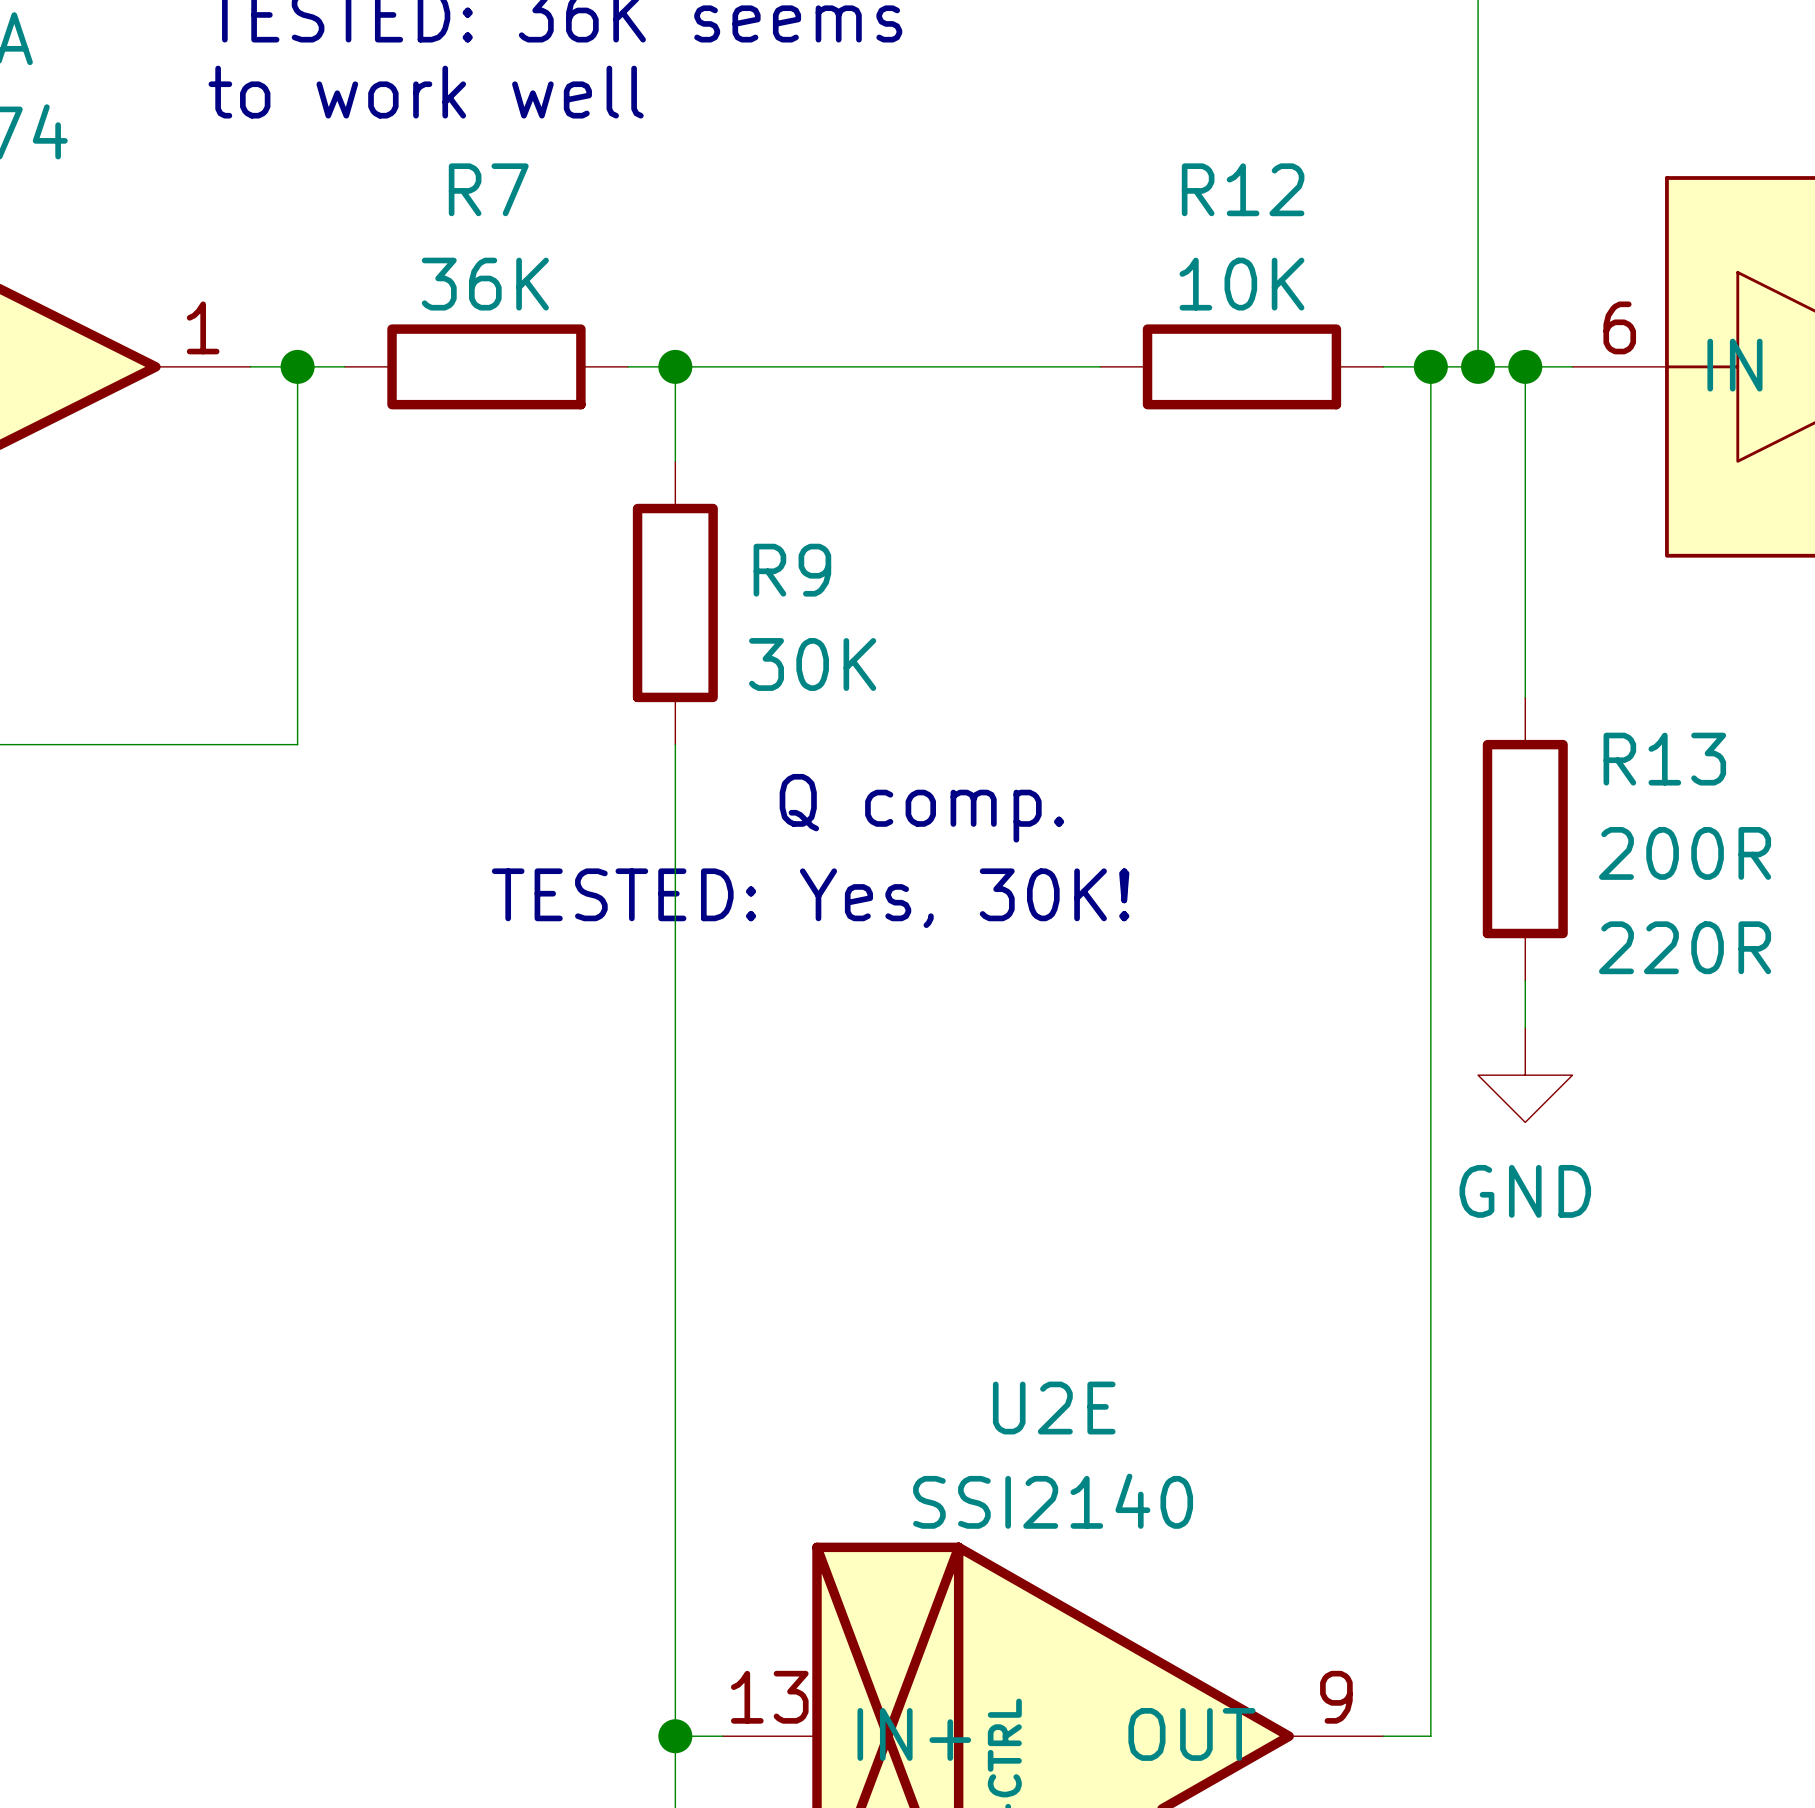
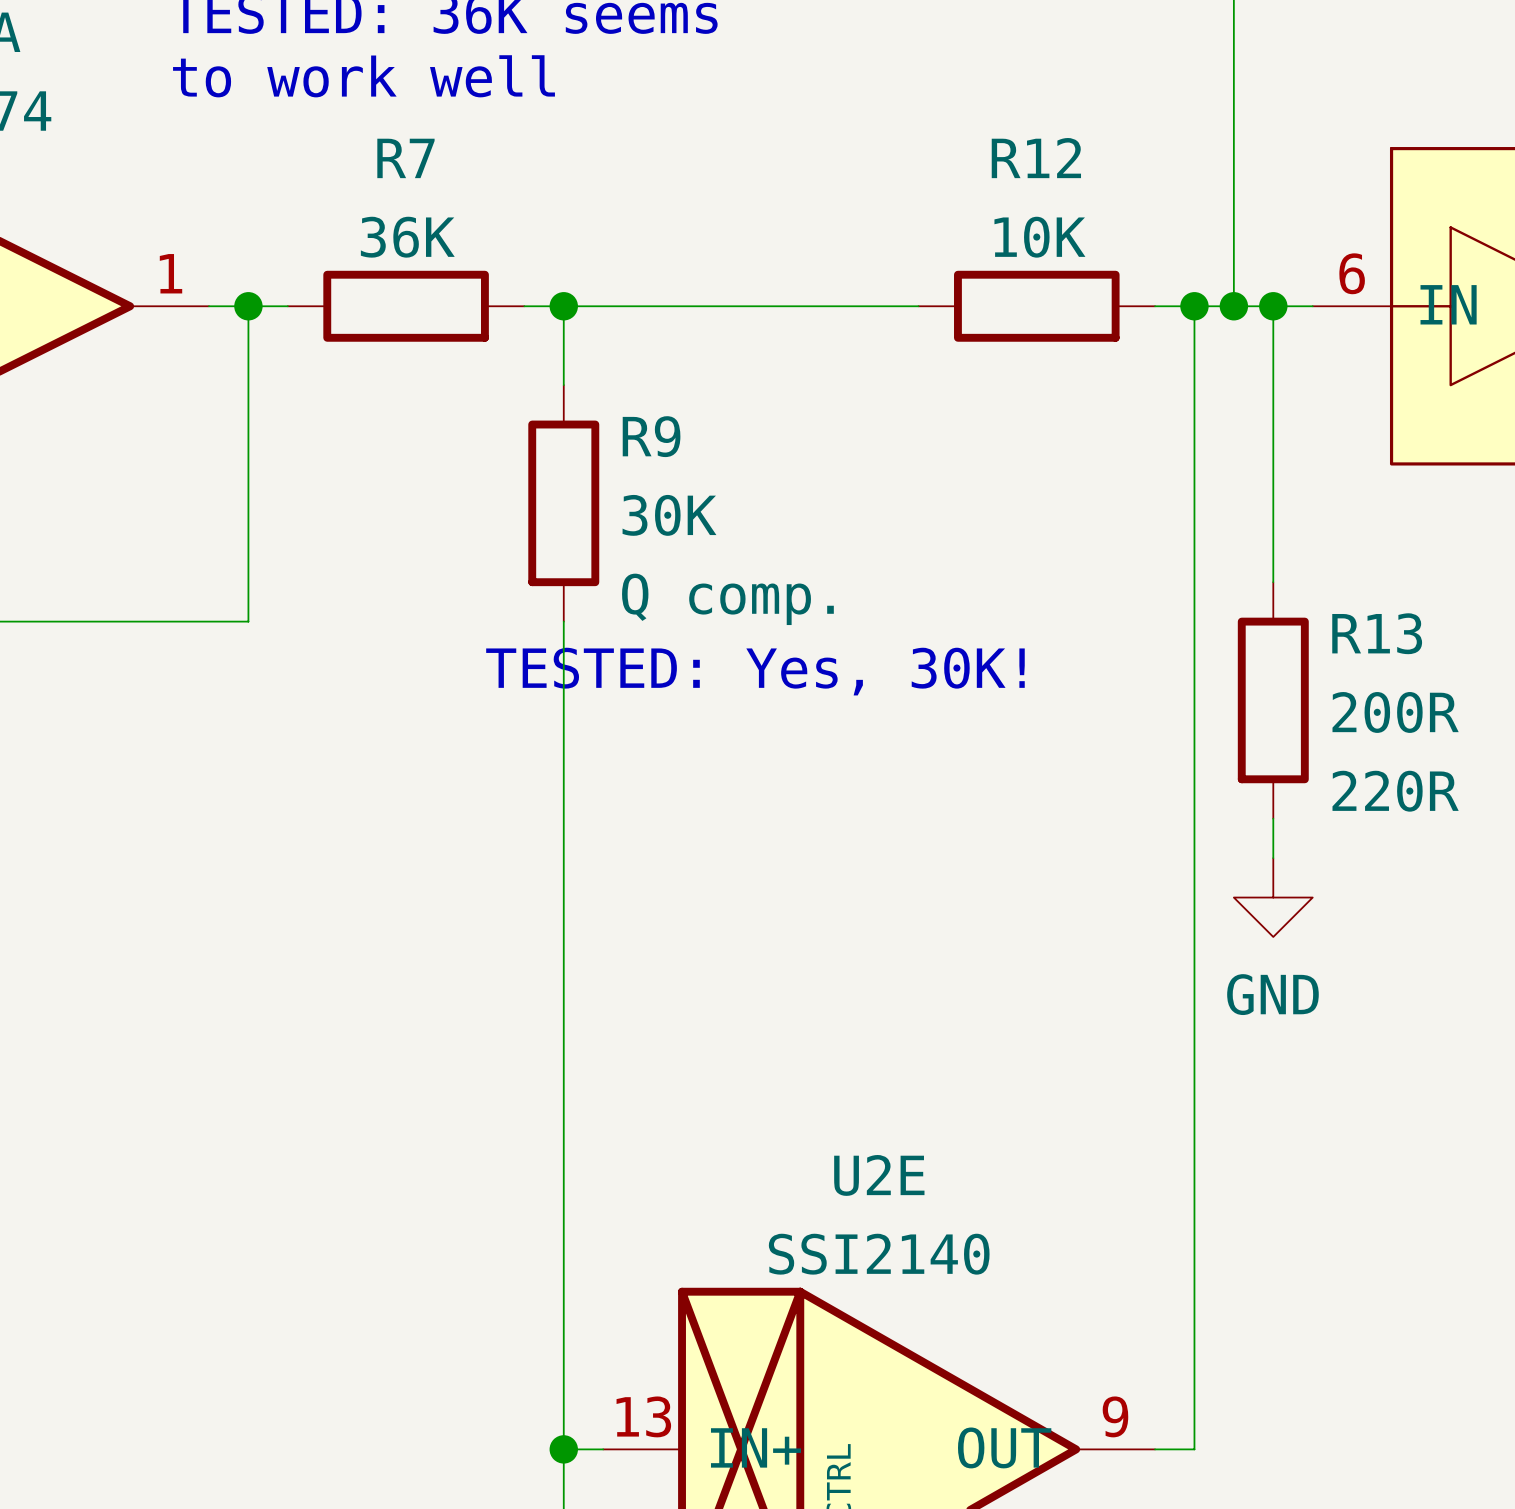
R9 name position: R9 (792, 570) -> R9 (651, 436)
R9 value position: 30K (812, 664) -> 30K (669, 515)
R9 text: none -> Q comp. (727, 599)
text: Q comp. (921, 808) -> none
text position: TESTED: Yes, 30K! (810, 898) -> TESTED: Yes, 30K! (755, 671)

